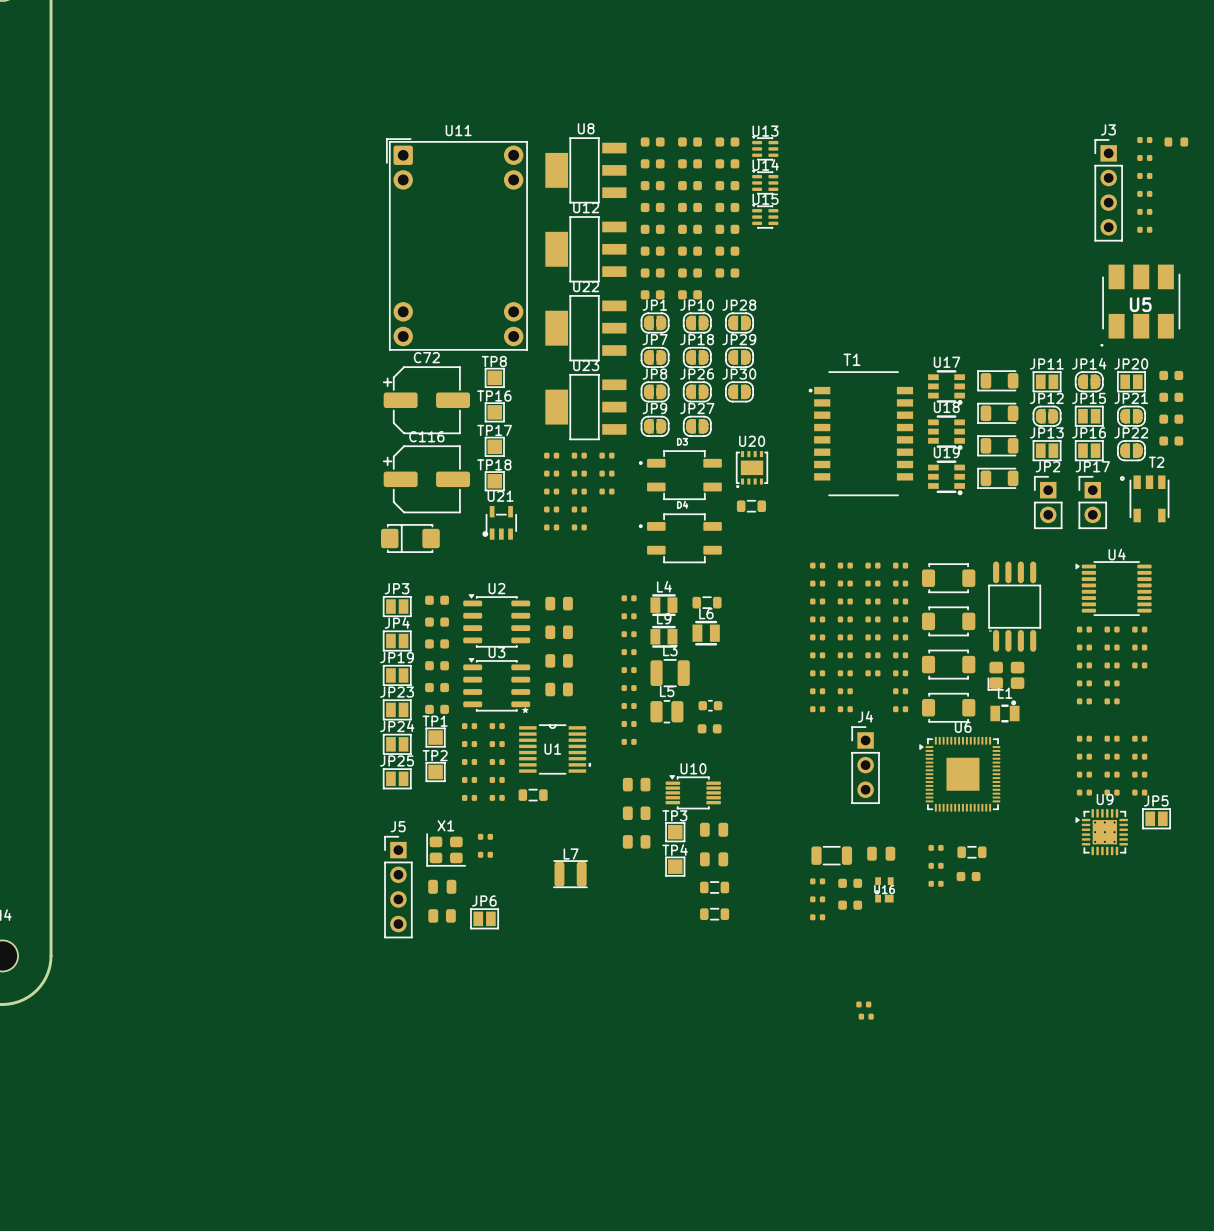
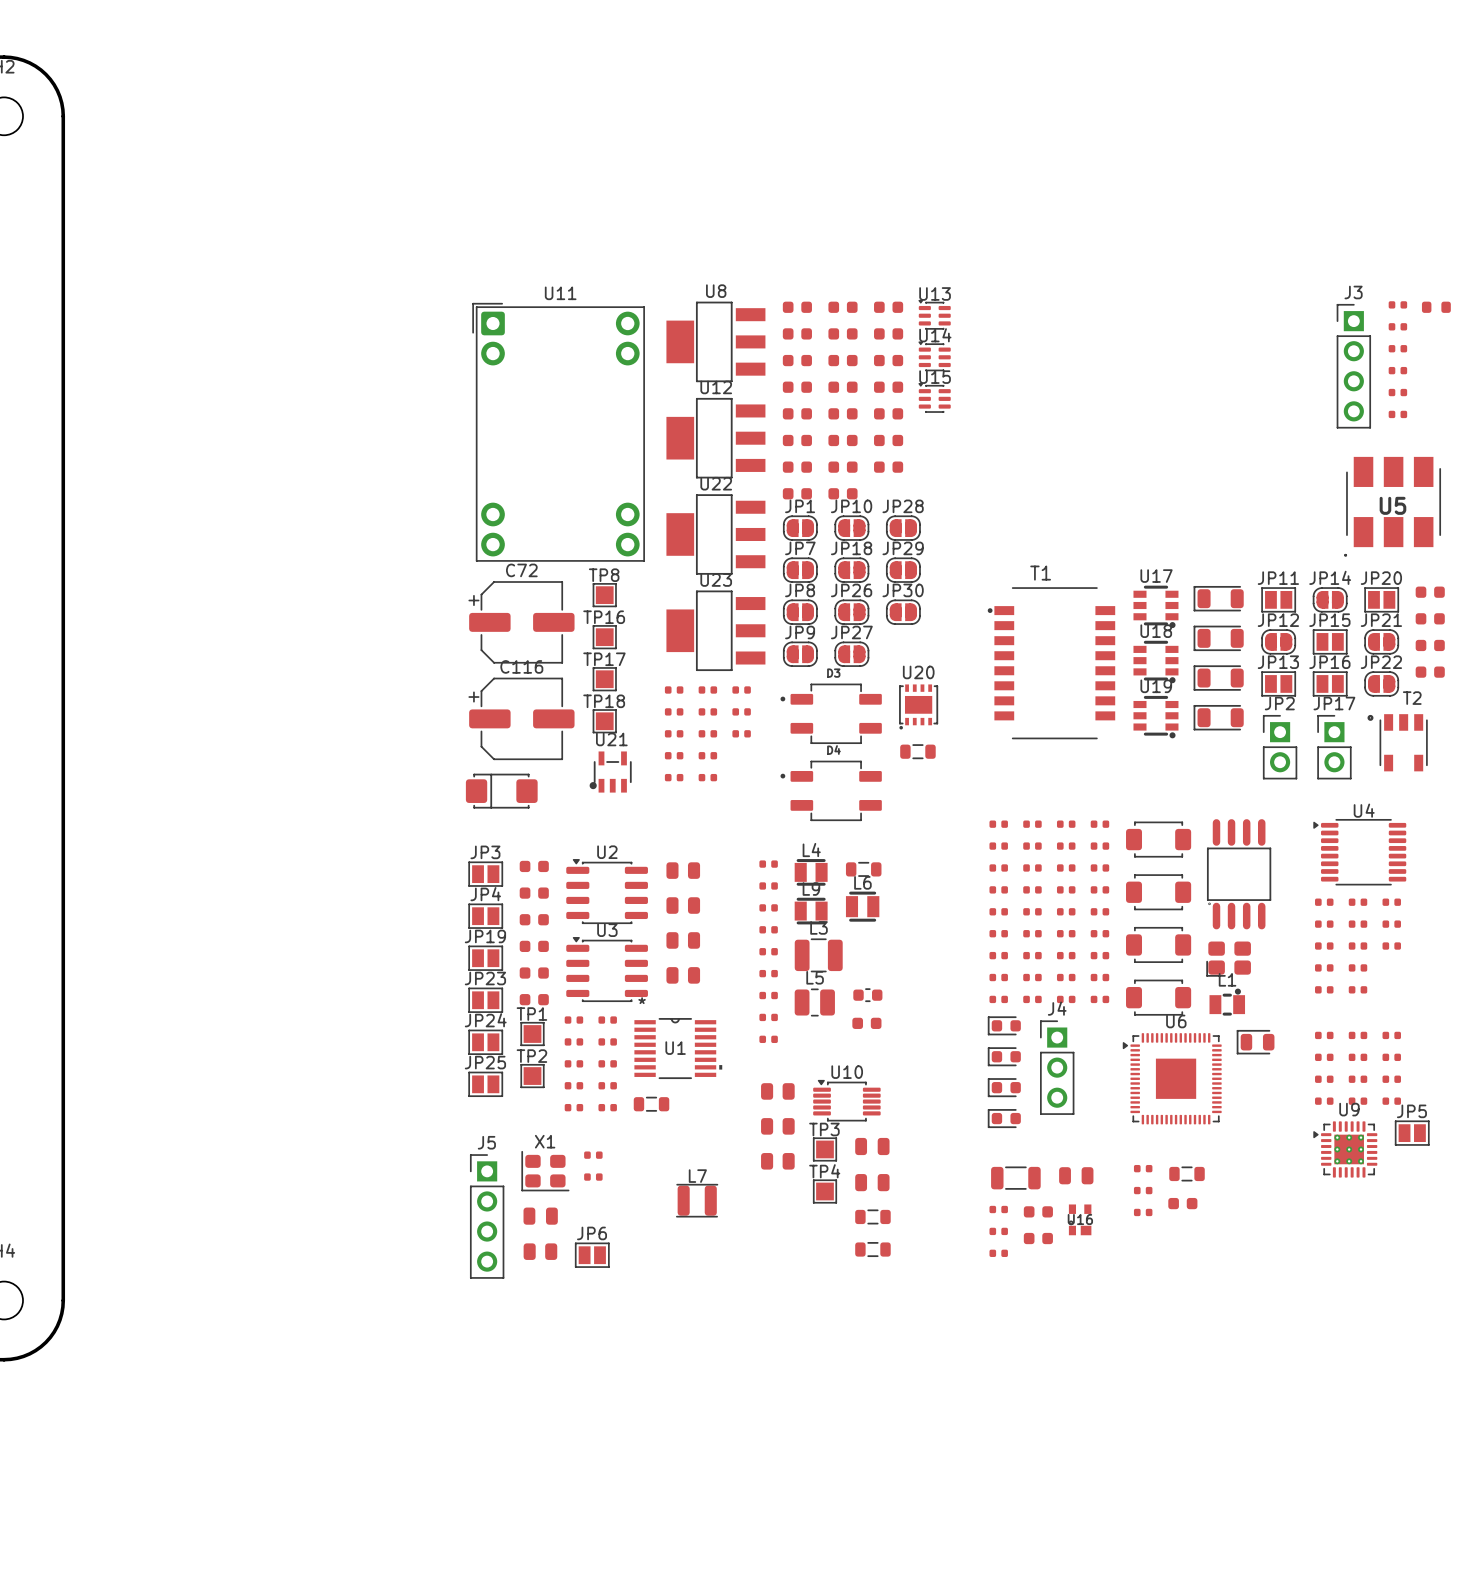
part: none -> (1066, 977)
part: none -> (1066, 999)
part: none -> (1004, 1025)
part: none -> (1255, 1042)
part: none -> (1004, 1056)
part: none -> (1004, 1087)
part: none -> (1004, 1118)
part: (863, 1004) -> none
part: (866, 1016) -> none

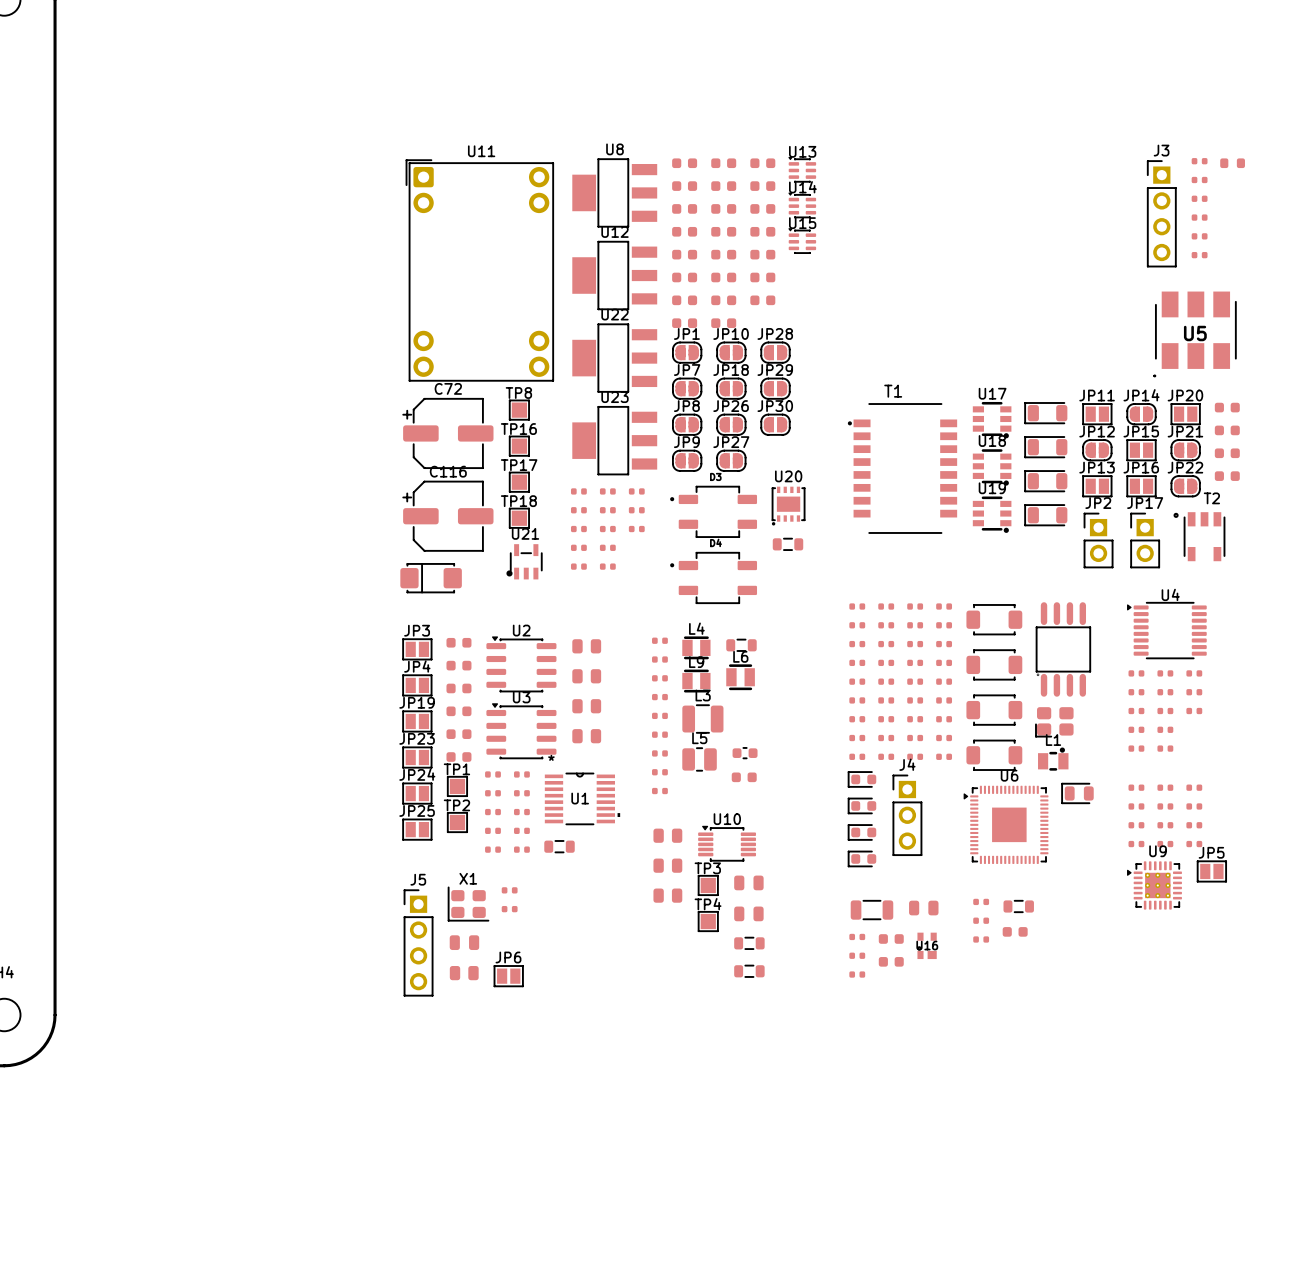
L7: (697, 1200) -> none

